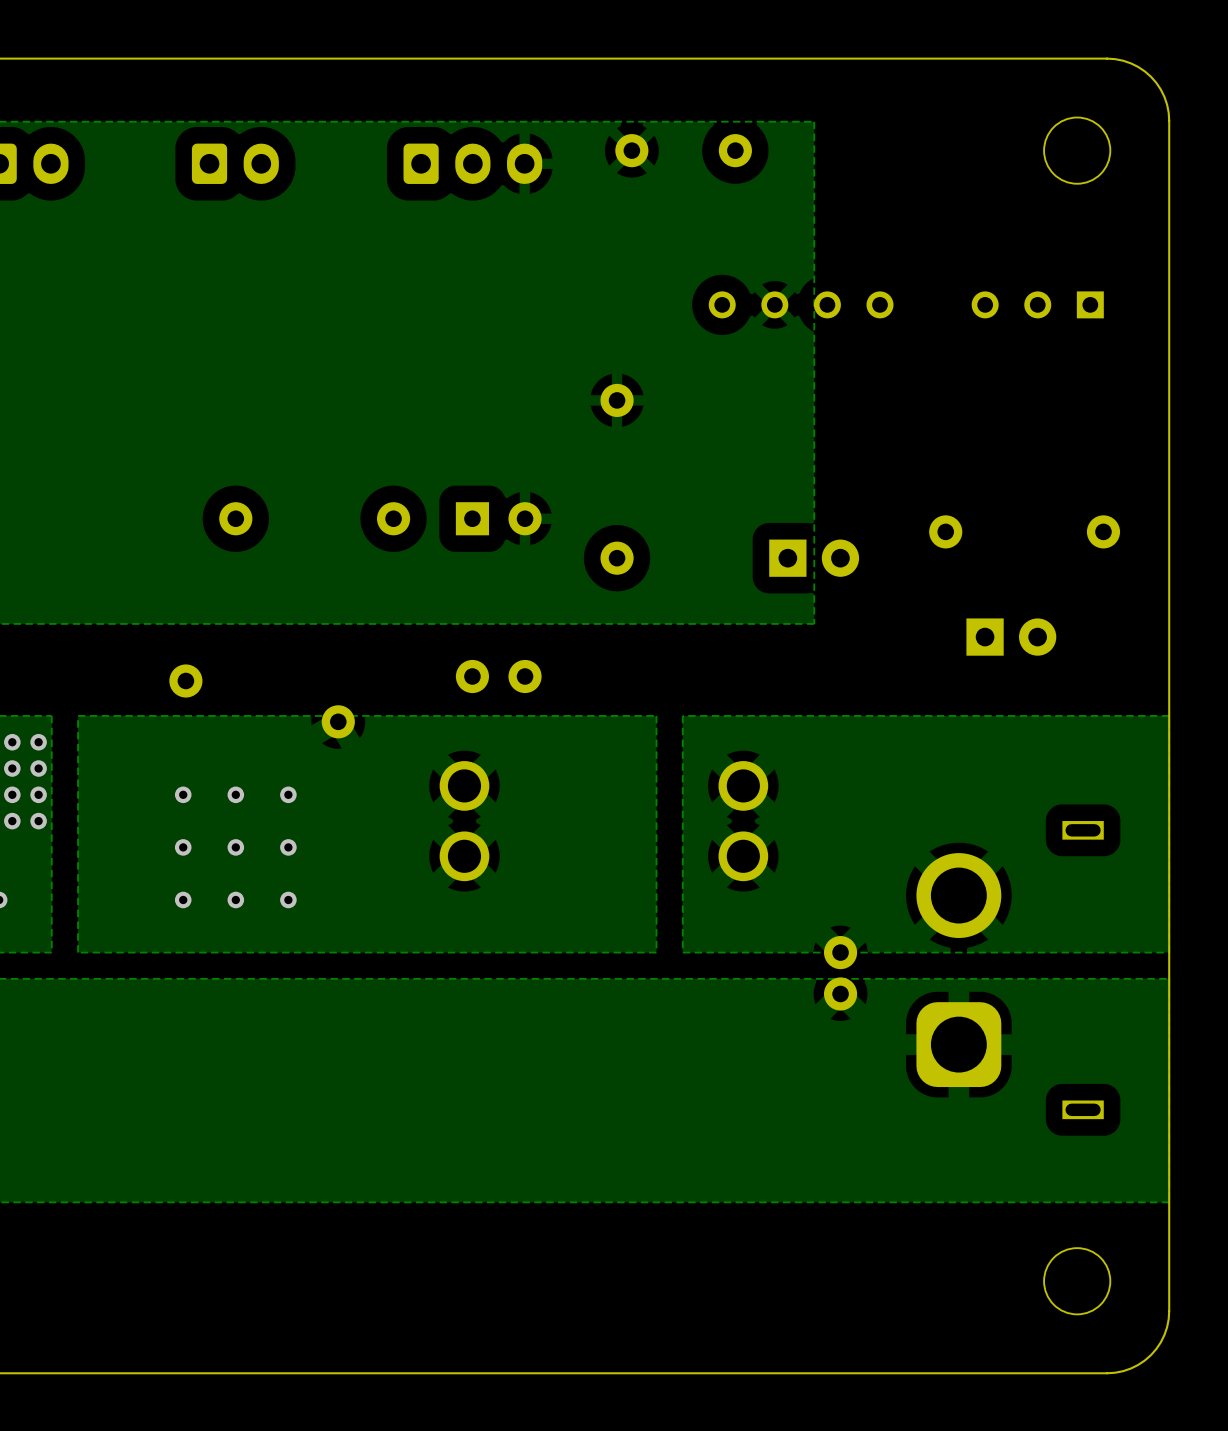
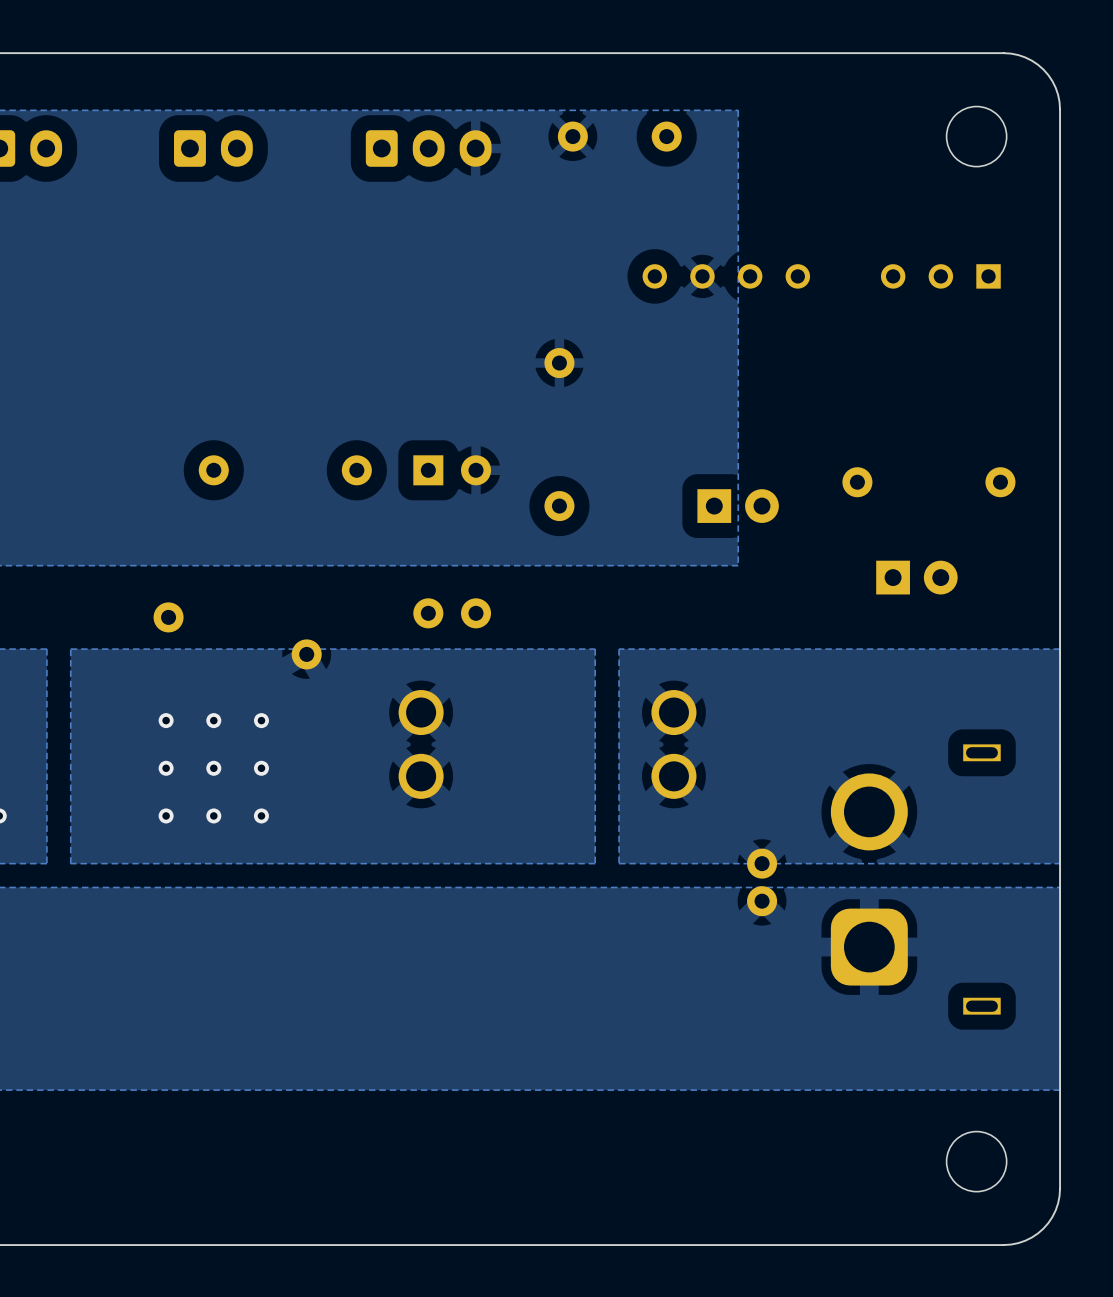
via: (12, 742) -> none
via: (38, 742) -> none
via: (12, 768) -> none
via: (38, 768) -> none
via: (12, 794) -> none
via: (38, 794) -> none
via: (12, 821) -> none
via: (38, 821) -> none

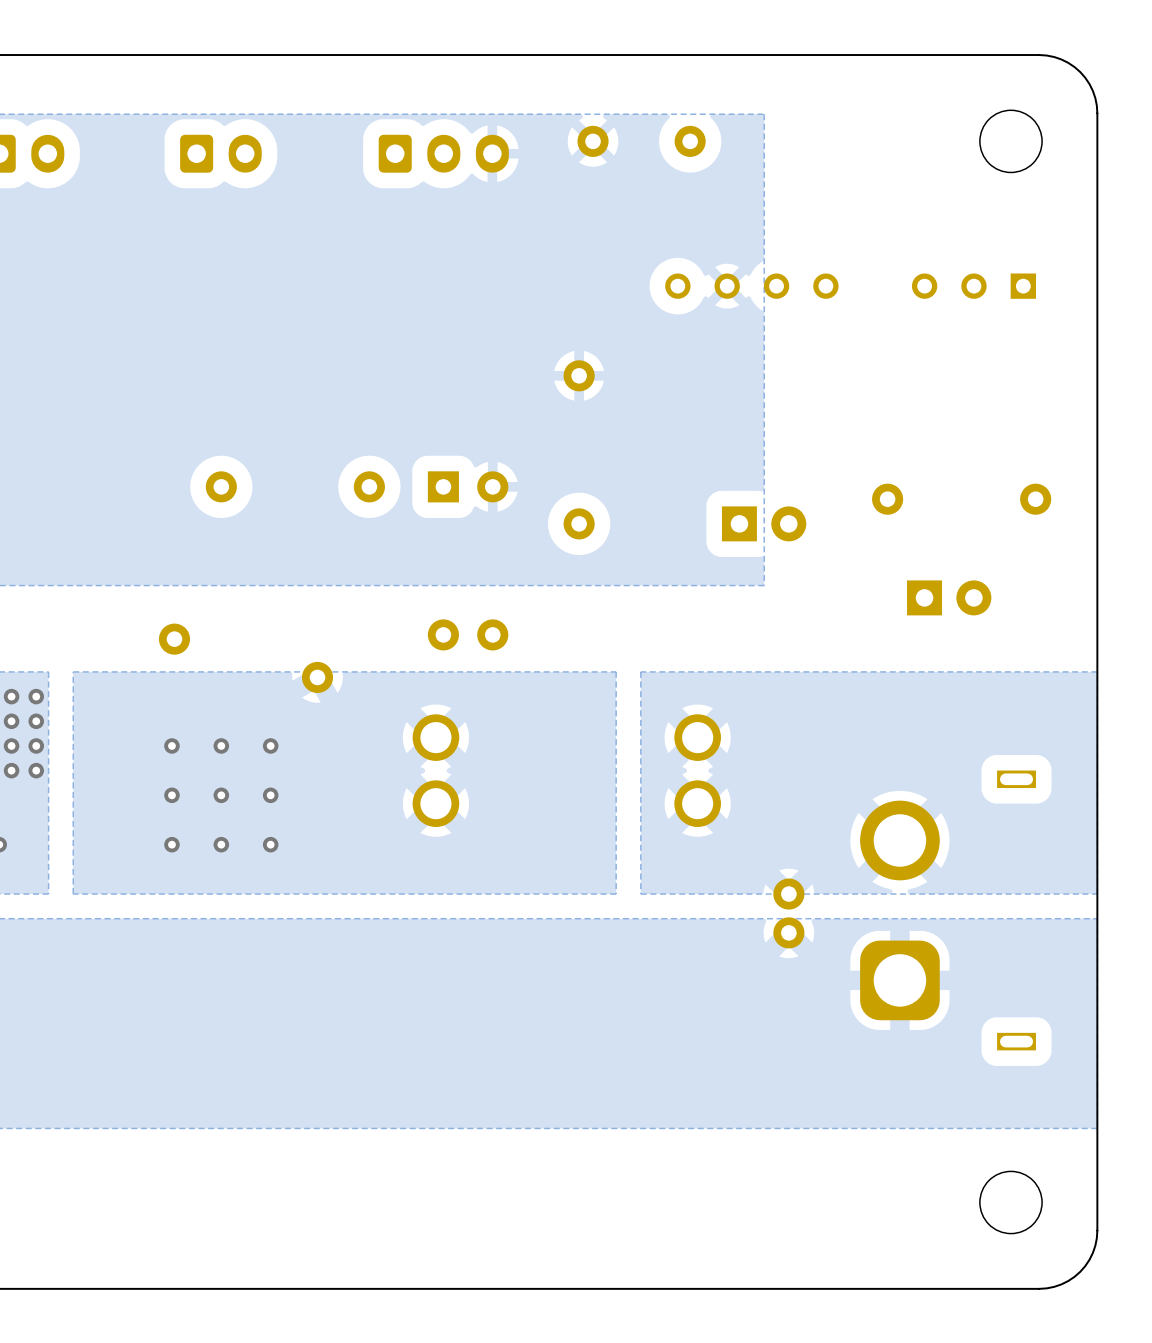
via: none -> (11, 696)
via: none -> (36, 696)
via: none -> (11, 721)
via: none -> (36, 721)
via: none -> (11, 745)
via: none -> (36, 745)
via: none -> (11, 770)
via: none -> (36, 770)

